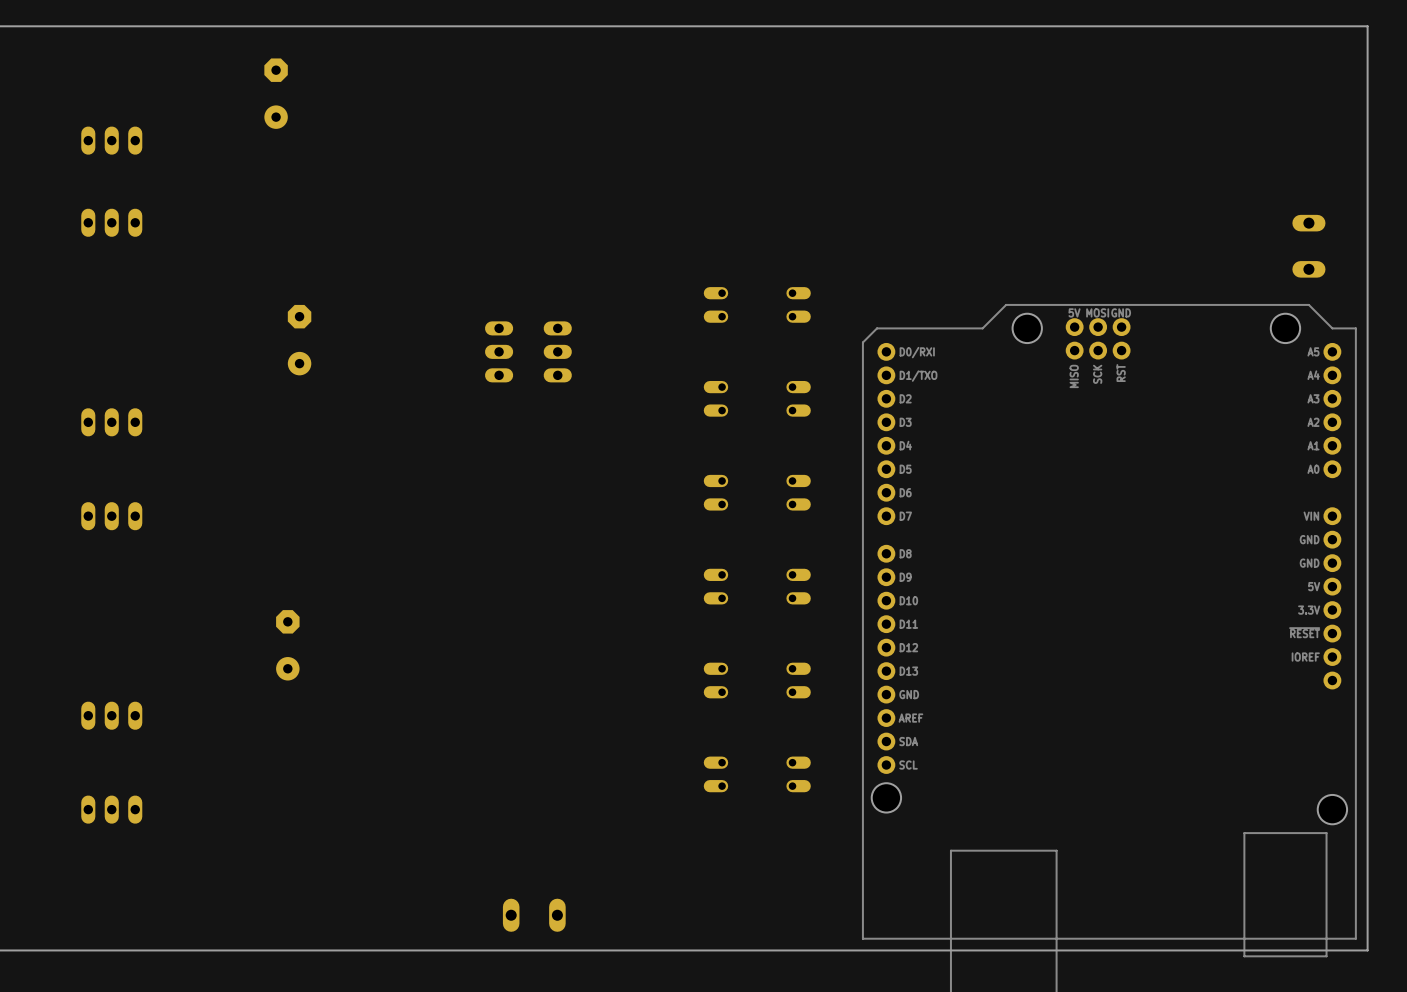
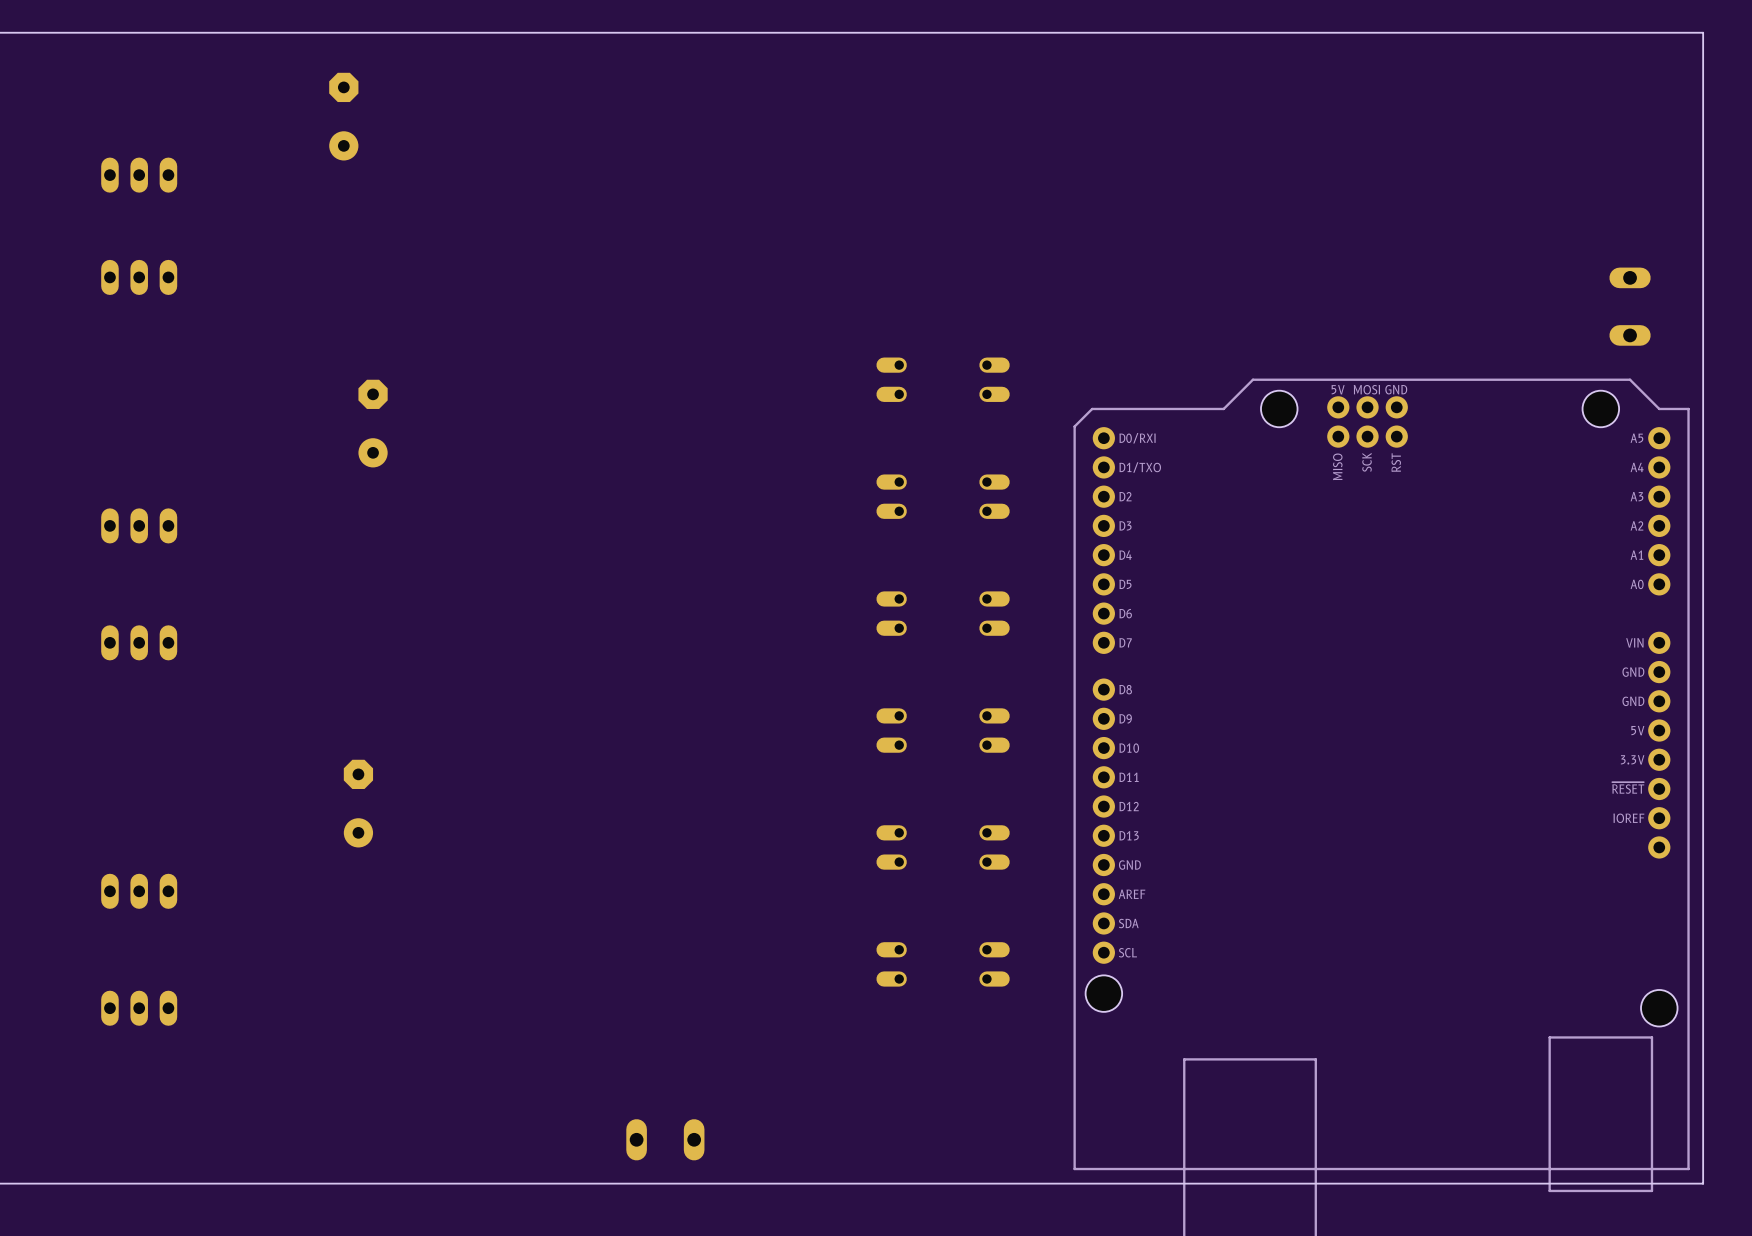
part: (499, 351) -> none
part: (557, 351) -> none

